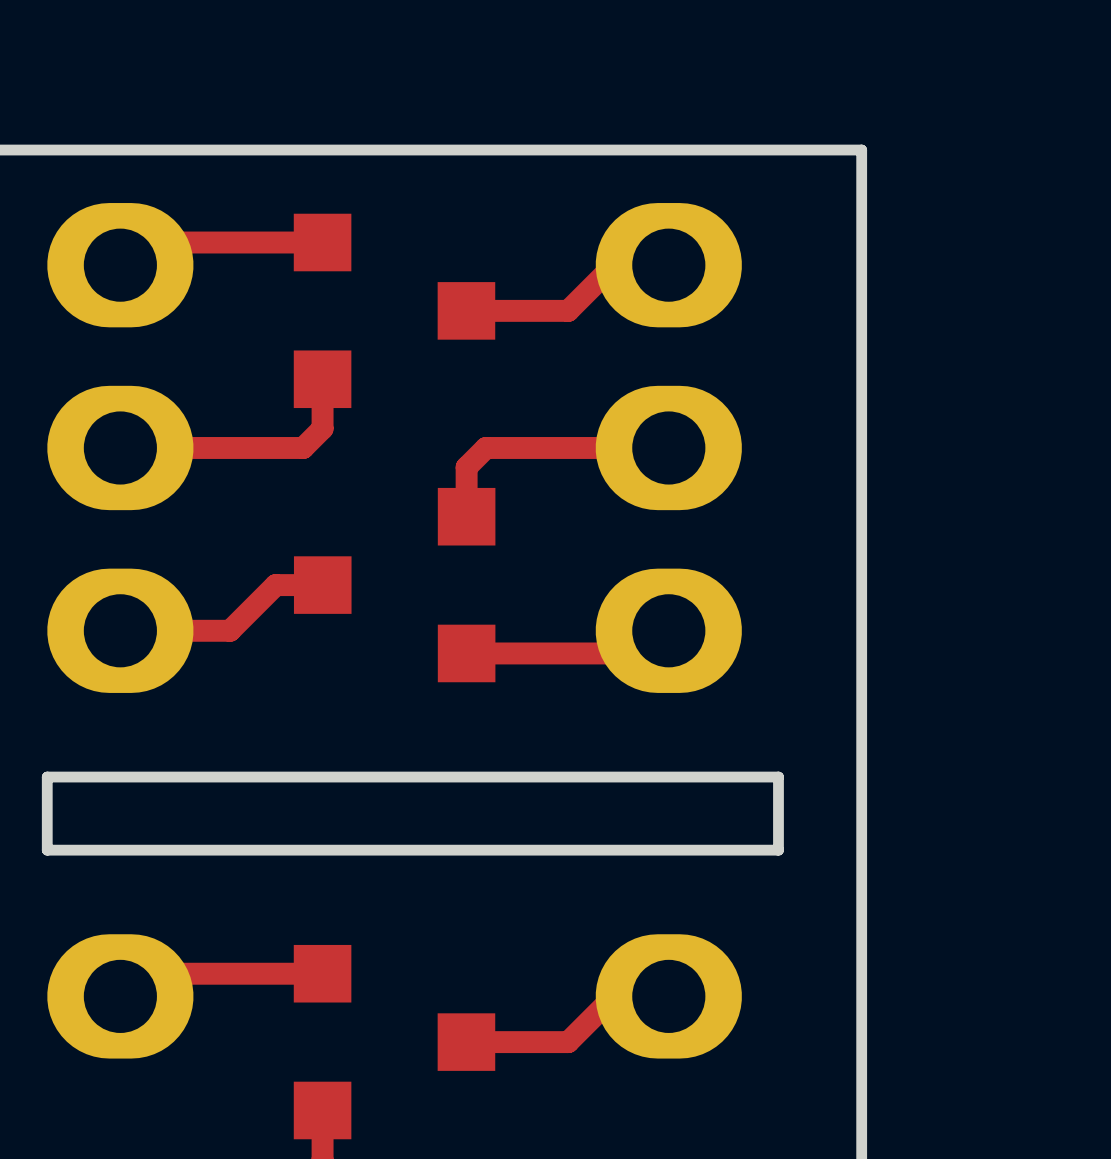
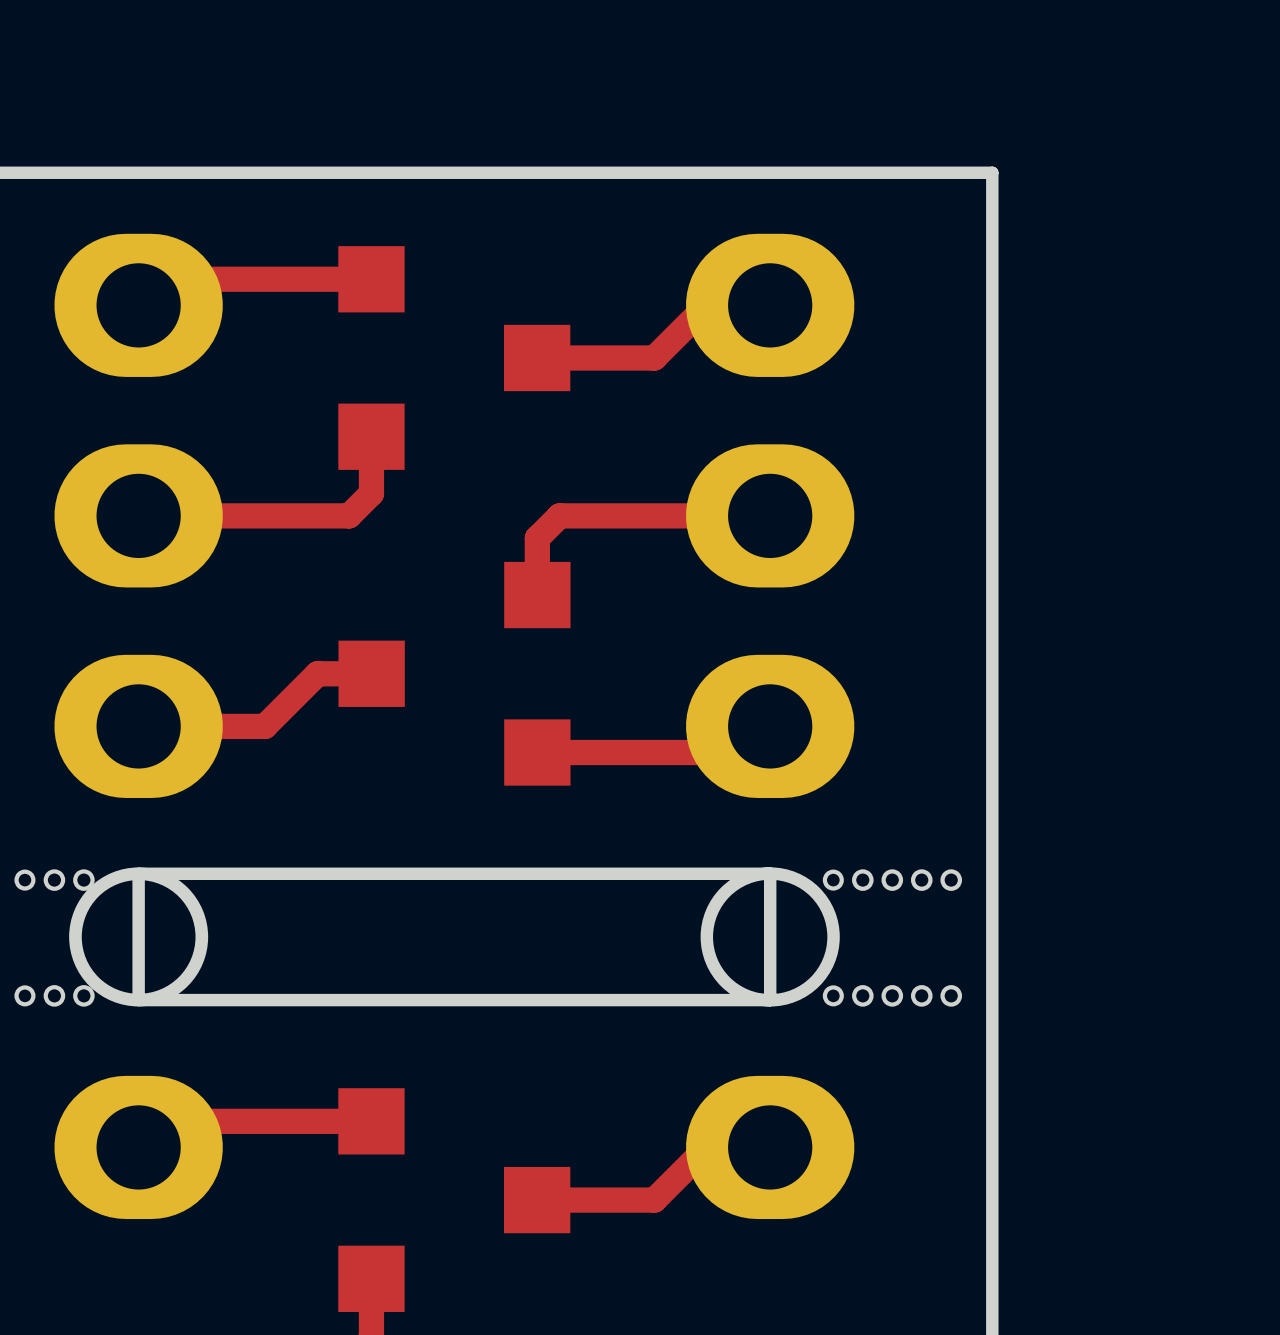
round board edge: none -> [69, 867, 209, 1007]
round board edge: none -> [700, 867, 840, 1007]
round board edge: none -> [43, 869, 66, 891]
round board edge: none -> [73, 869, 95, 891]
round board edge: none -> [852, 869, 874, 891]
round board edge: none -> [881, 869, 904, 891]
round board edge: none -> [910, 869, 933, 891]
round board edge: none -> [940, 869, 963, 891]
round board edge: none -> [14, 869, 36, 891]
round board edge: none -> [822, 869, 844, 891]
board edge: (47, 777) (47, 850) (778, 850) (778, 777) (47, 777) -> (138, 873) (138, 1000) (770, 1000) (770, 873) (138, 873)
round board edge: none -> [14, 985, 36, 1007]
round board edge: none -> [43, 985, 66, 1007]
round board edge: none -> [73, 985, 95, 1007]
round board edge: none -> [822, 985, 844, 1007]
round board edge: none -> [852, 985, 874, 1007]
round board edge: none -> [881, 985, 904, 1007]
round board edge: none -> [910, 985, 933, 1007]
round board edge: none -> [940, 985, 963, 1007]

